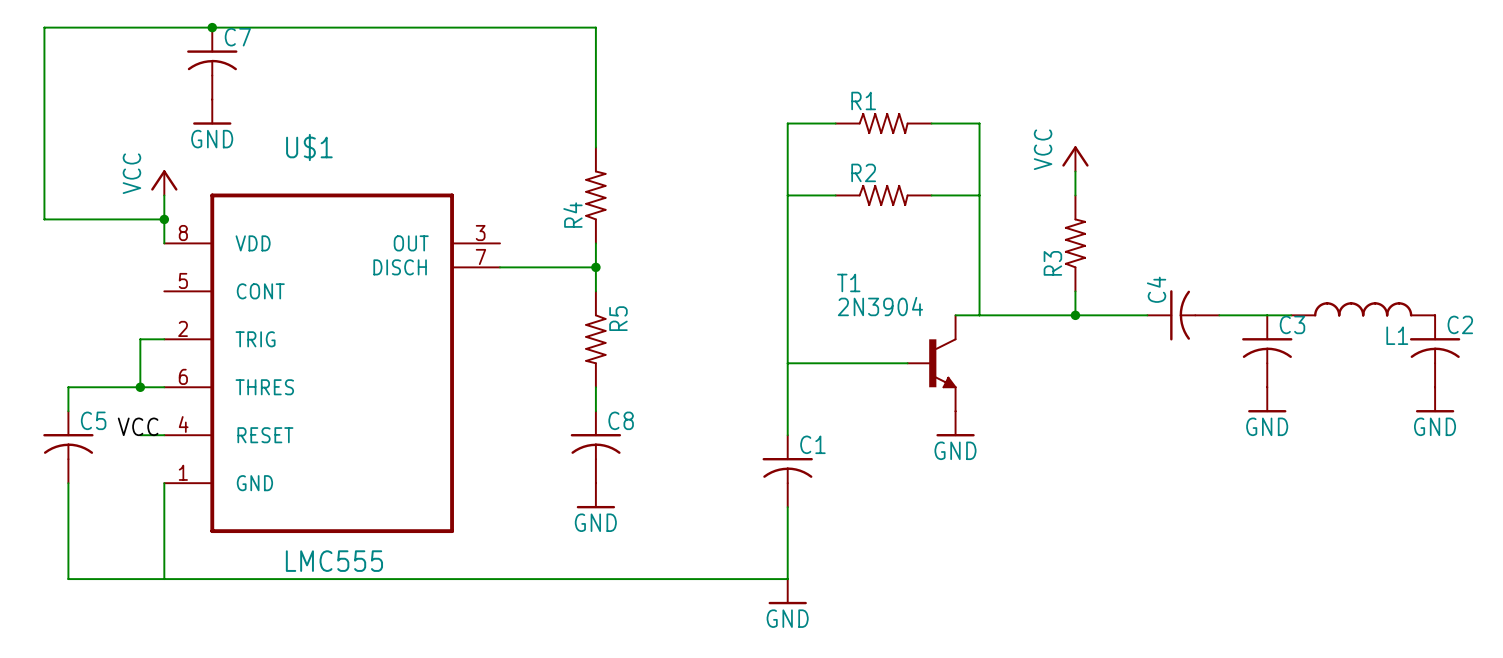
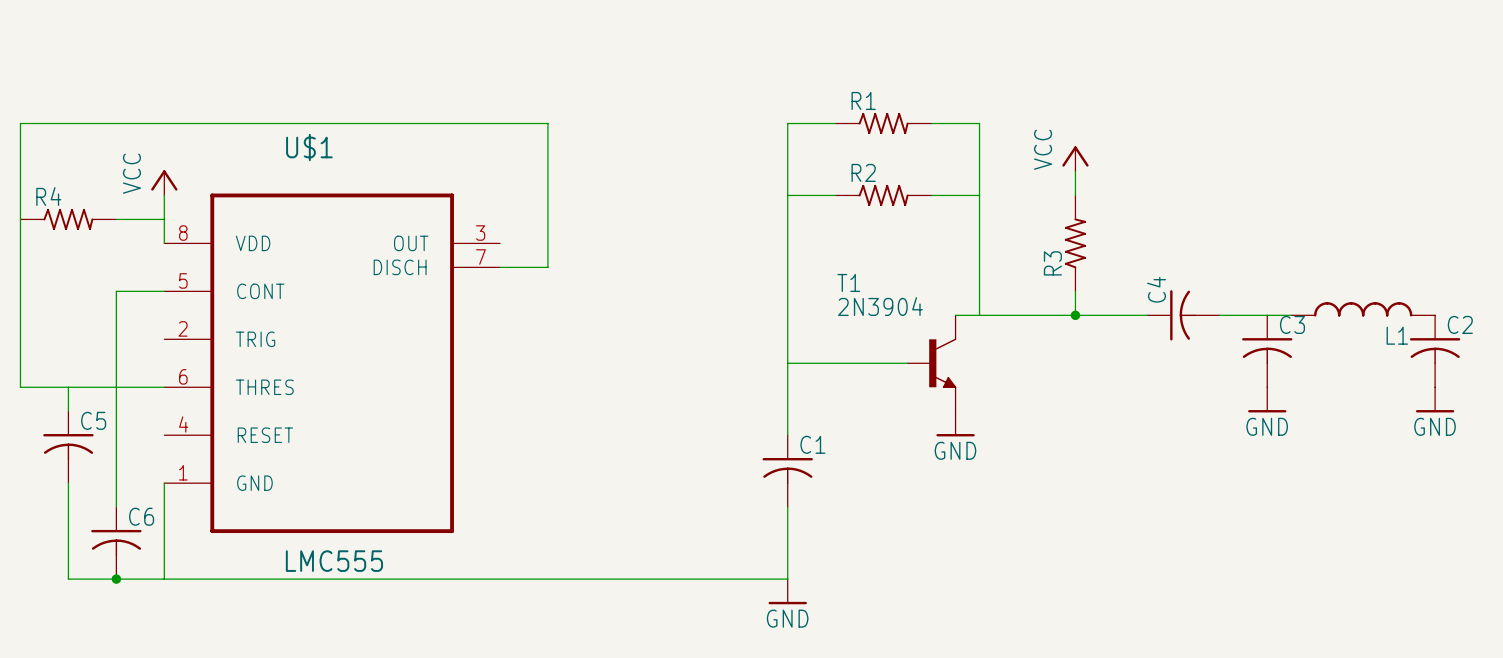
junction: (212, 27) -> none
C7: (212, 63) -> none
power symbol: GND (212, 112) -> none
wire: (595, 147) (595, 27) (44, 27) (44, 219) (116, 219) -> none
R4 rotation: 0° (595, 195) -> 90° clockwise (68, 219)
R4 position: (595, 195) -> (68, 219)
junction: (164, 219) -> none
wire: (595, 243) (595, 291) -> none
wire: (547, 267) (595, 267) -> (547, 267) (547, 123) (20, 123) (20, 387) (68, 387)
junction: (595, 267) -> none
wire: none -> (164, 291) (116, 291) (116, 507)
wire: (164, 339) (140, 339) (140, 387) -> none
R5: (595, 339) -> none
junction: (140, 387) -> none
wire: (595, 387) (595, 411) -> none
label: VCC (138, 426) -> none
wire: (140, 435) (164, 435) -> none
C8: (595, 447) -> none
power symbol: GND (595, 495) -> none
C6: none -> (116, 543)
junction: none -> (116, 579)

